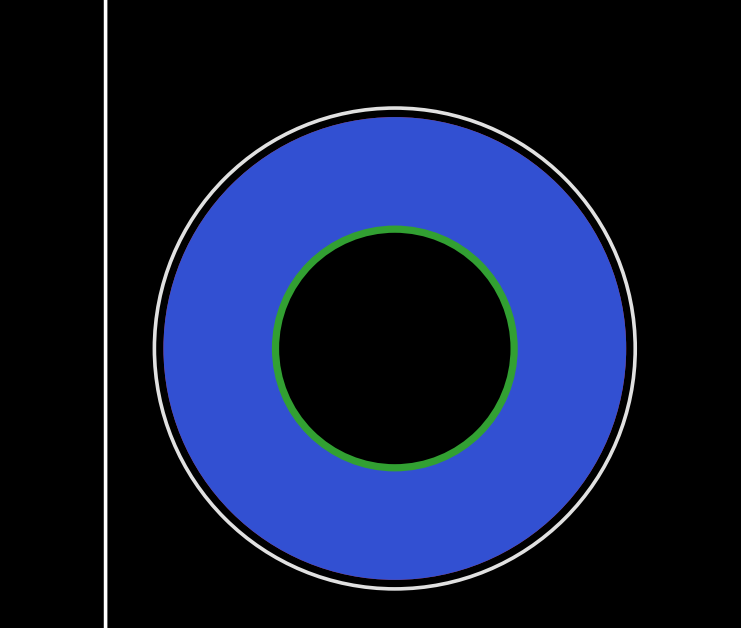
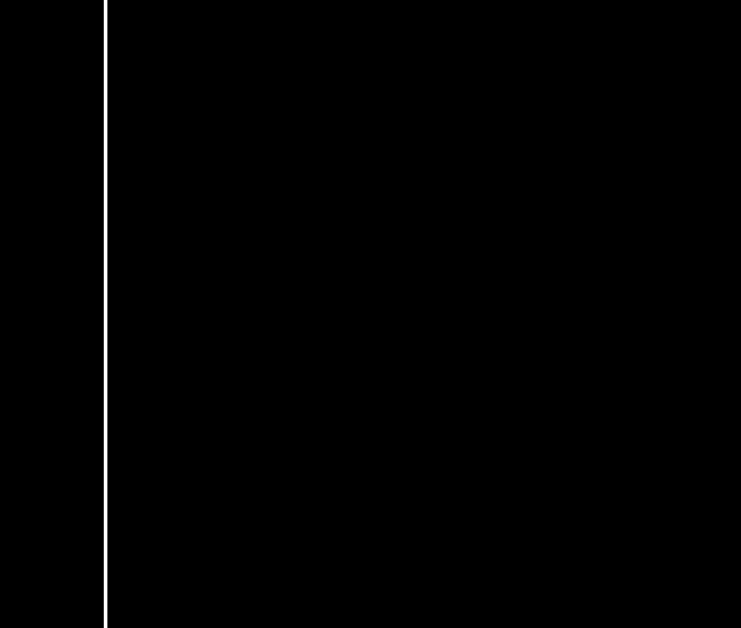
part: (394, 348) -> none

